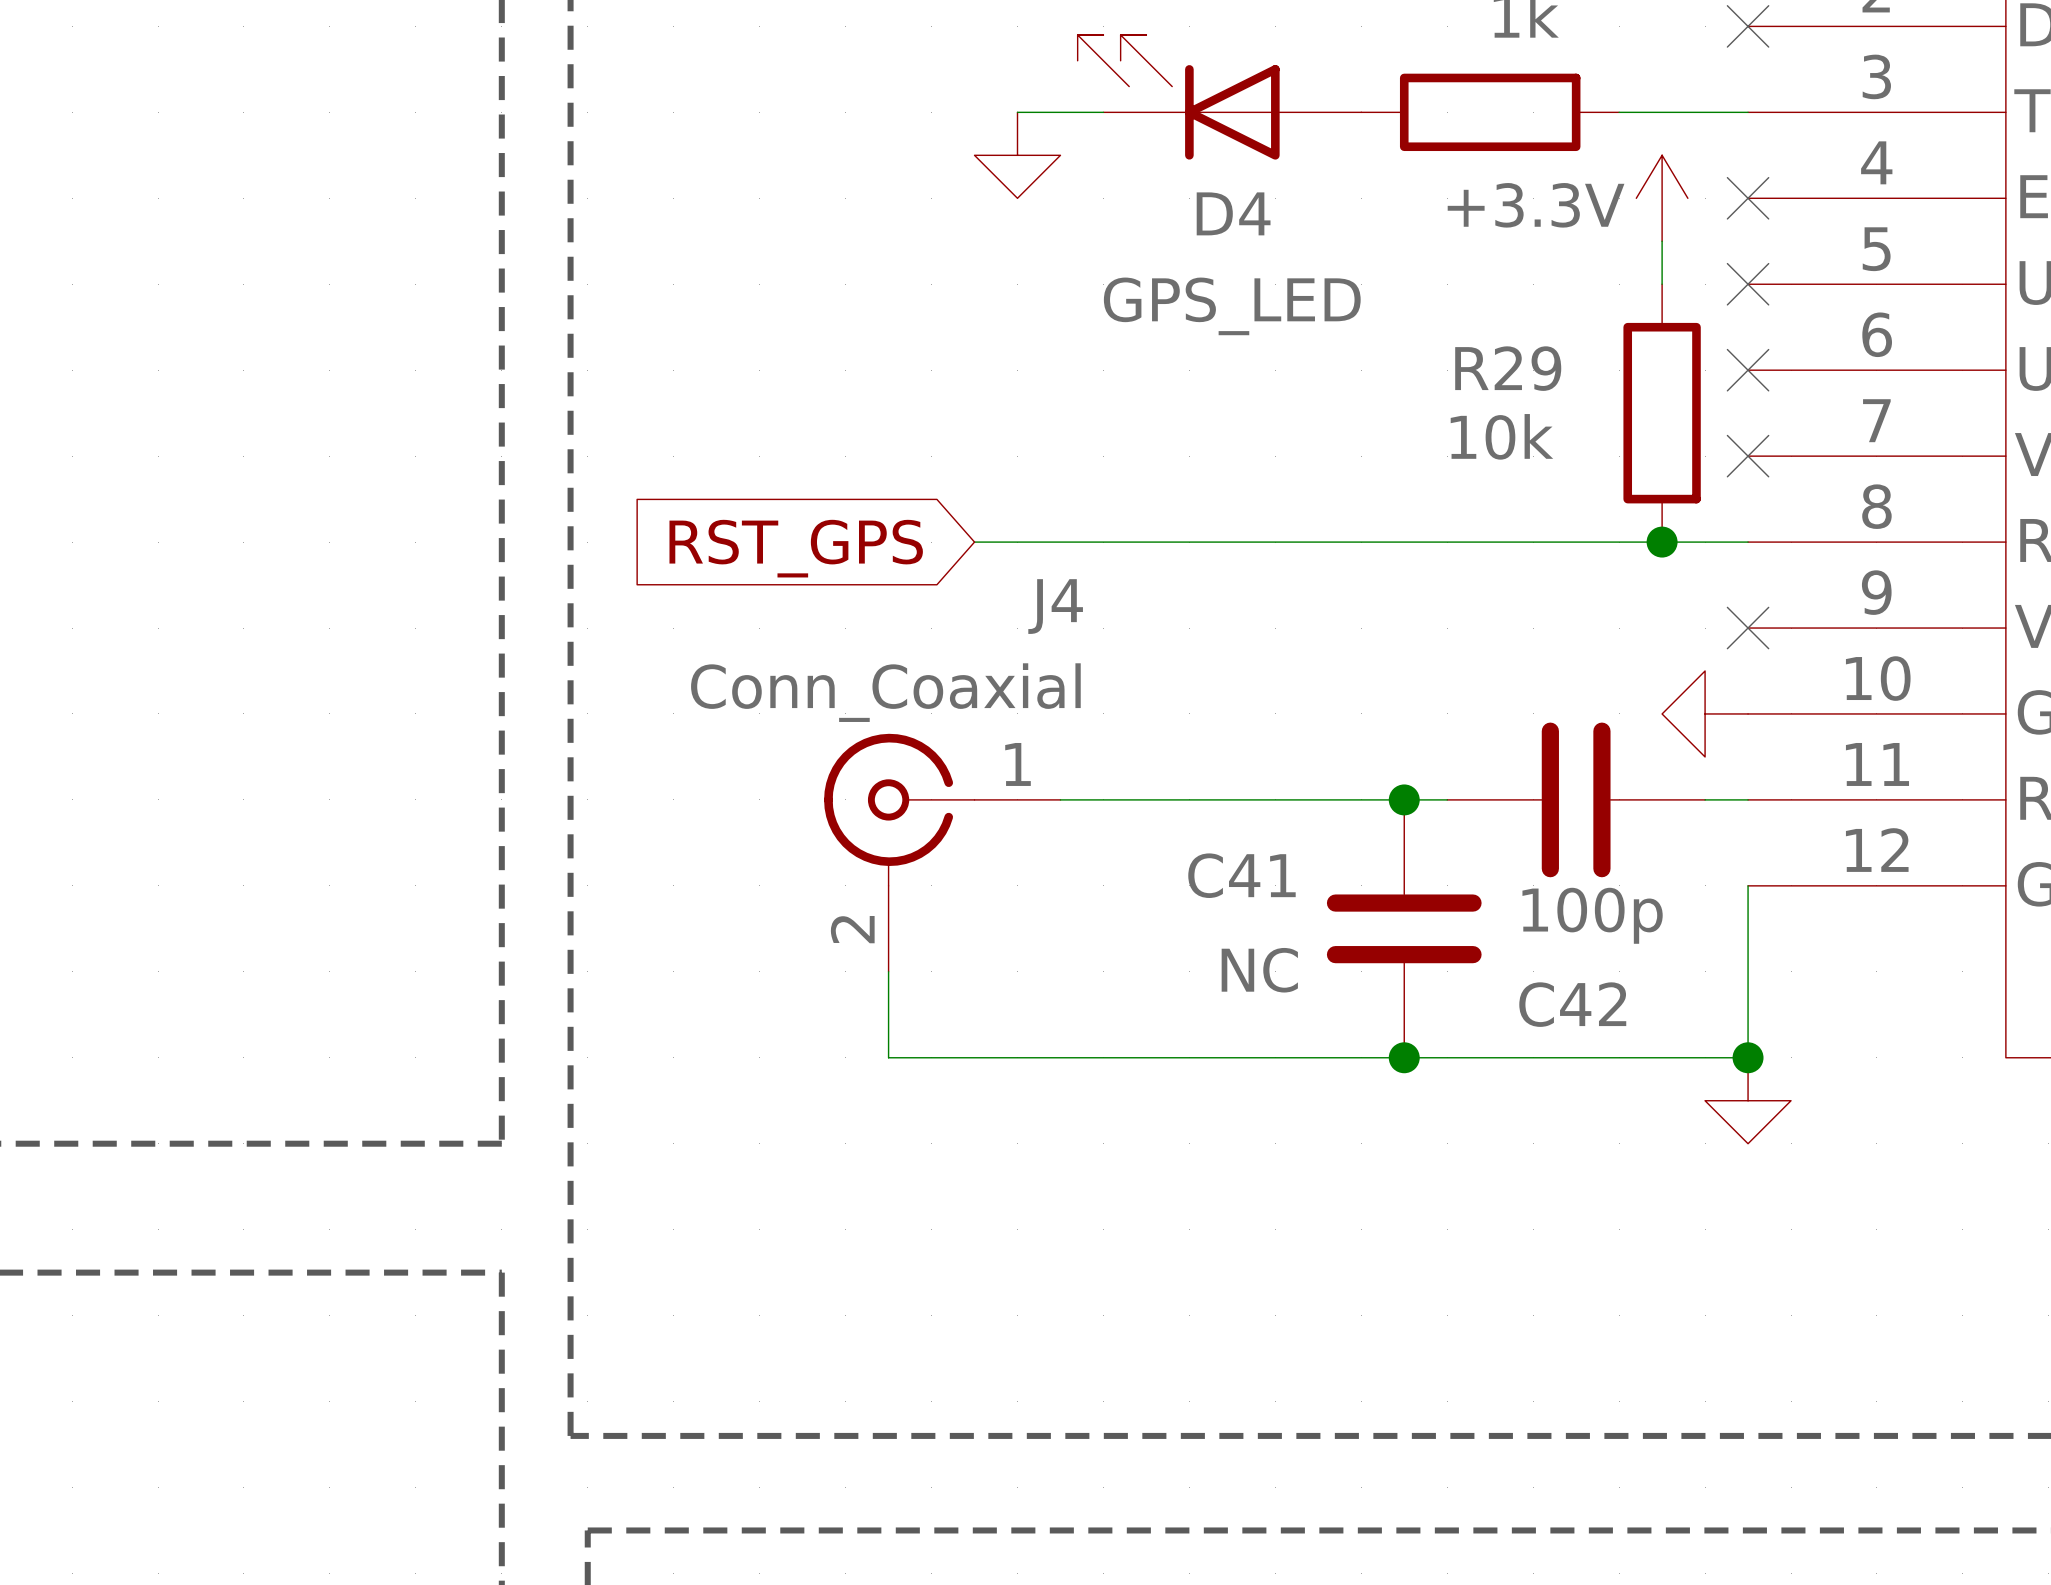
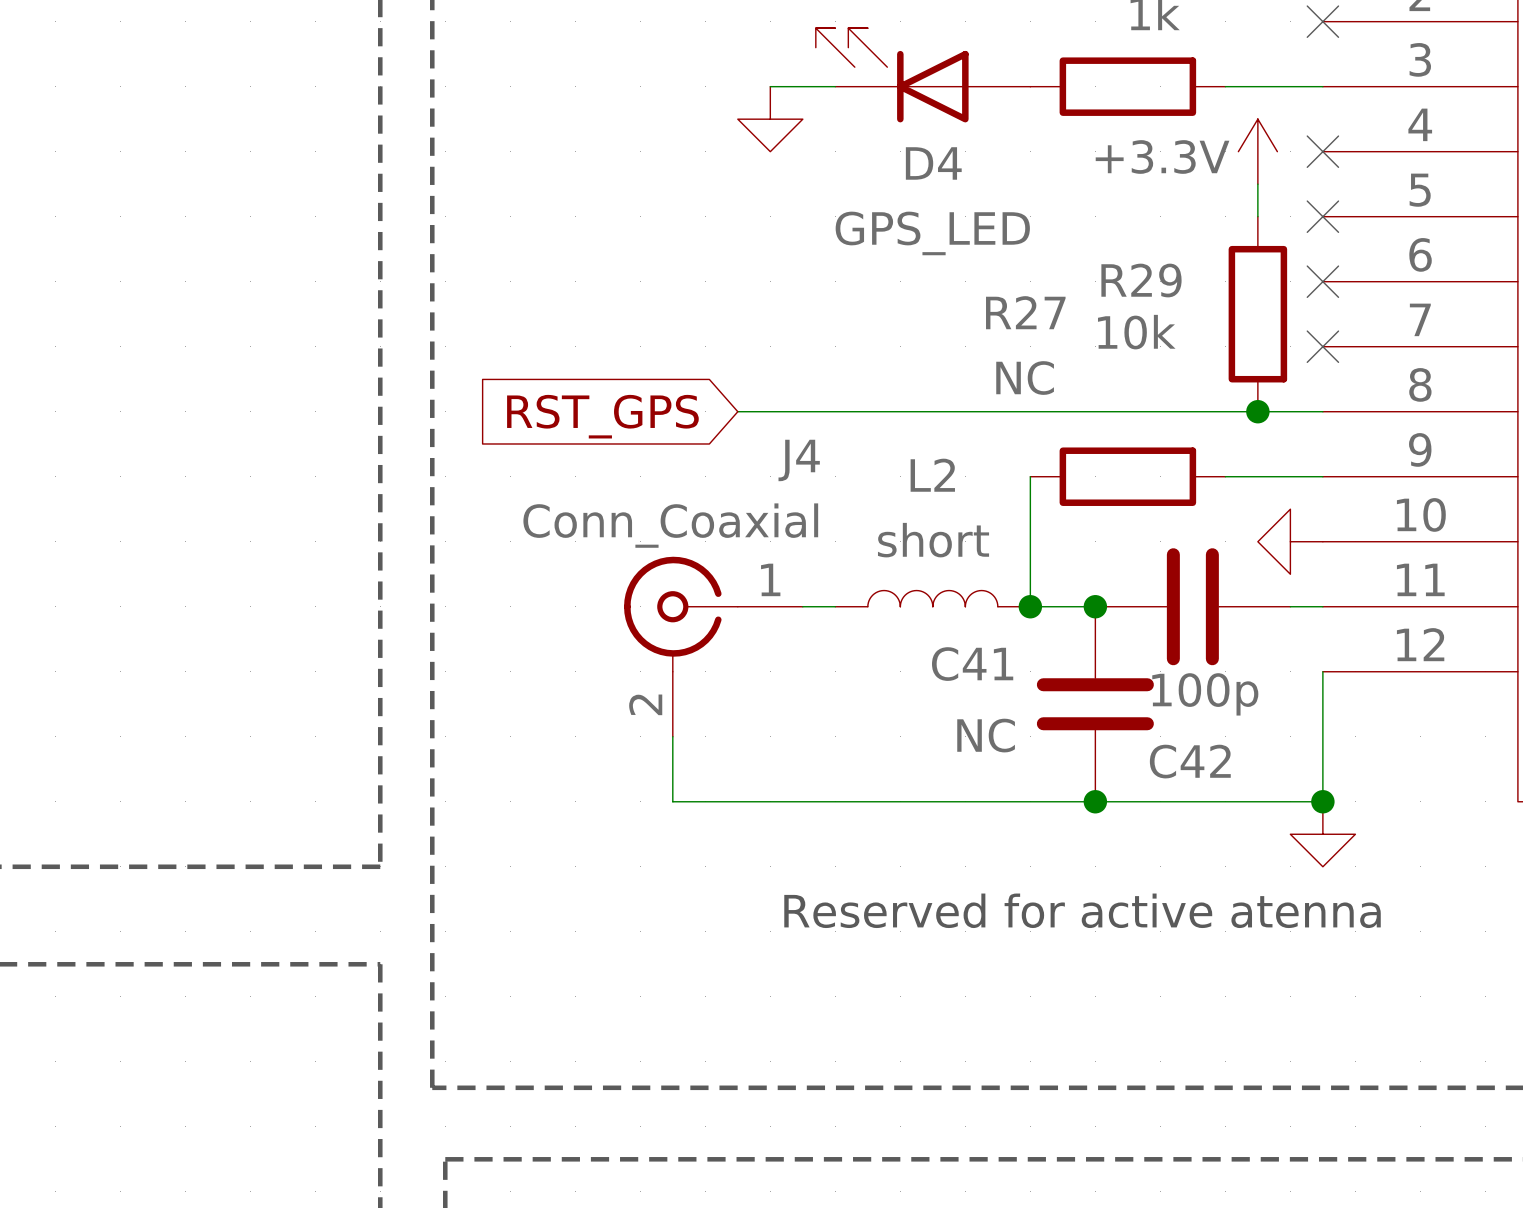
R27: none -> NC (1127, 476)
wire: none -> (1225, 476) (1322, 476)
no-connect mark: (1748, 628) -> none
L2: none -> short (932, 598)
wire: (1103, 799) (1361, 799) -> (1030, 476) (1030, 606)
junction: none -> (1030, 606)
junction: (1404, 799) -> none
junction: none -> (1095, 606)
C41 position: (1404, 928) -> (1095, 704)
junction position: (1404, 1057) -> (1095, 801)
text: none -> Reserved for active atenna (1082, 910)

